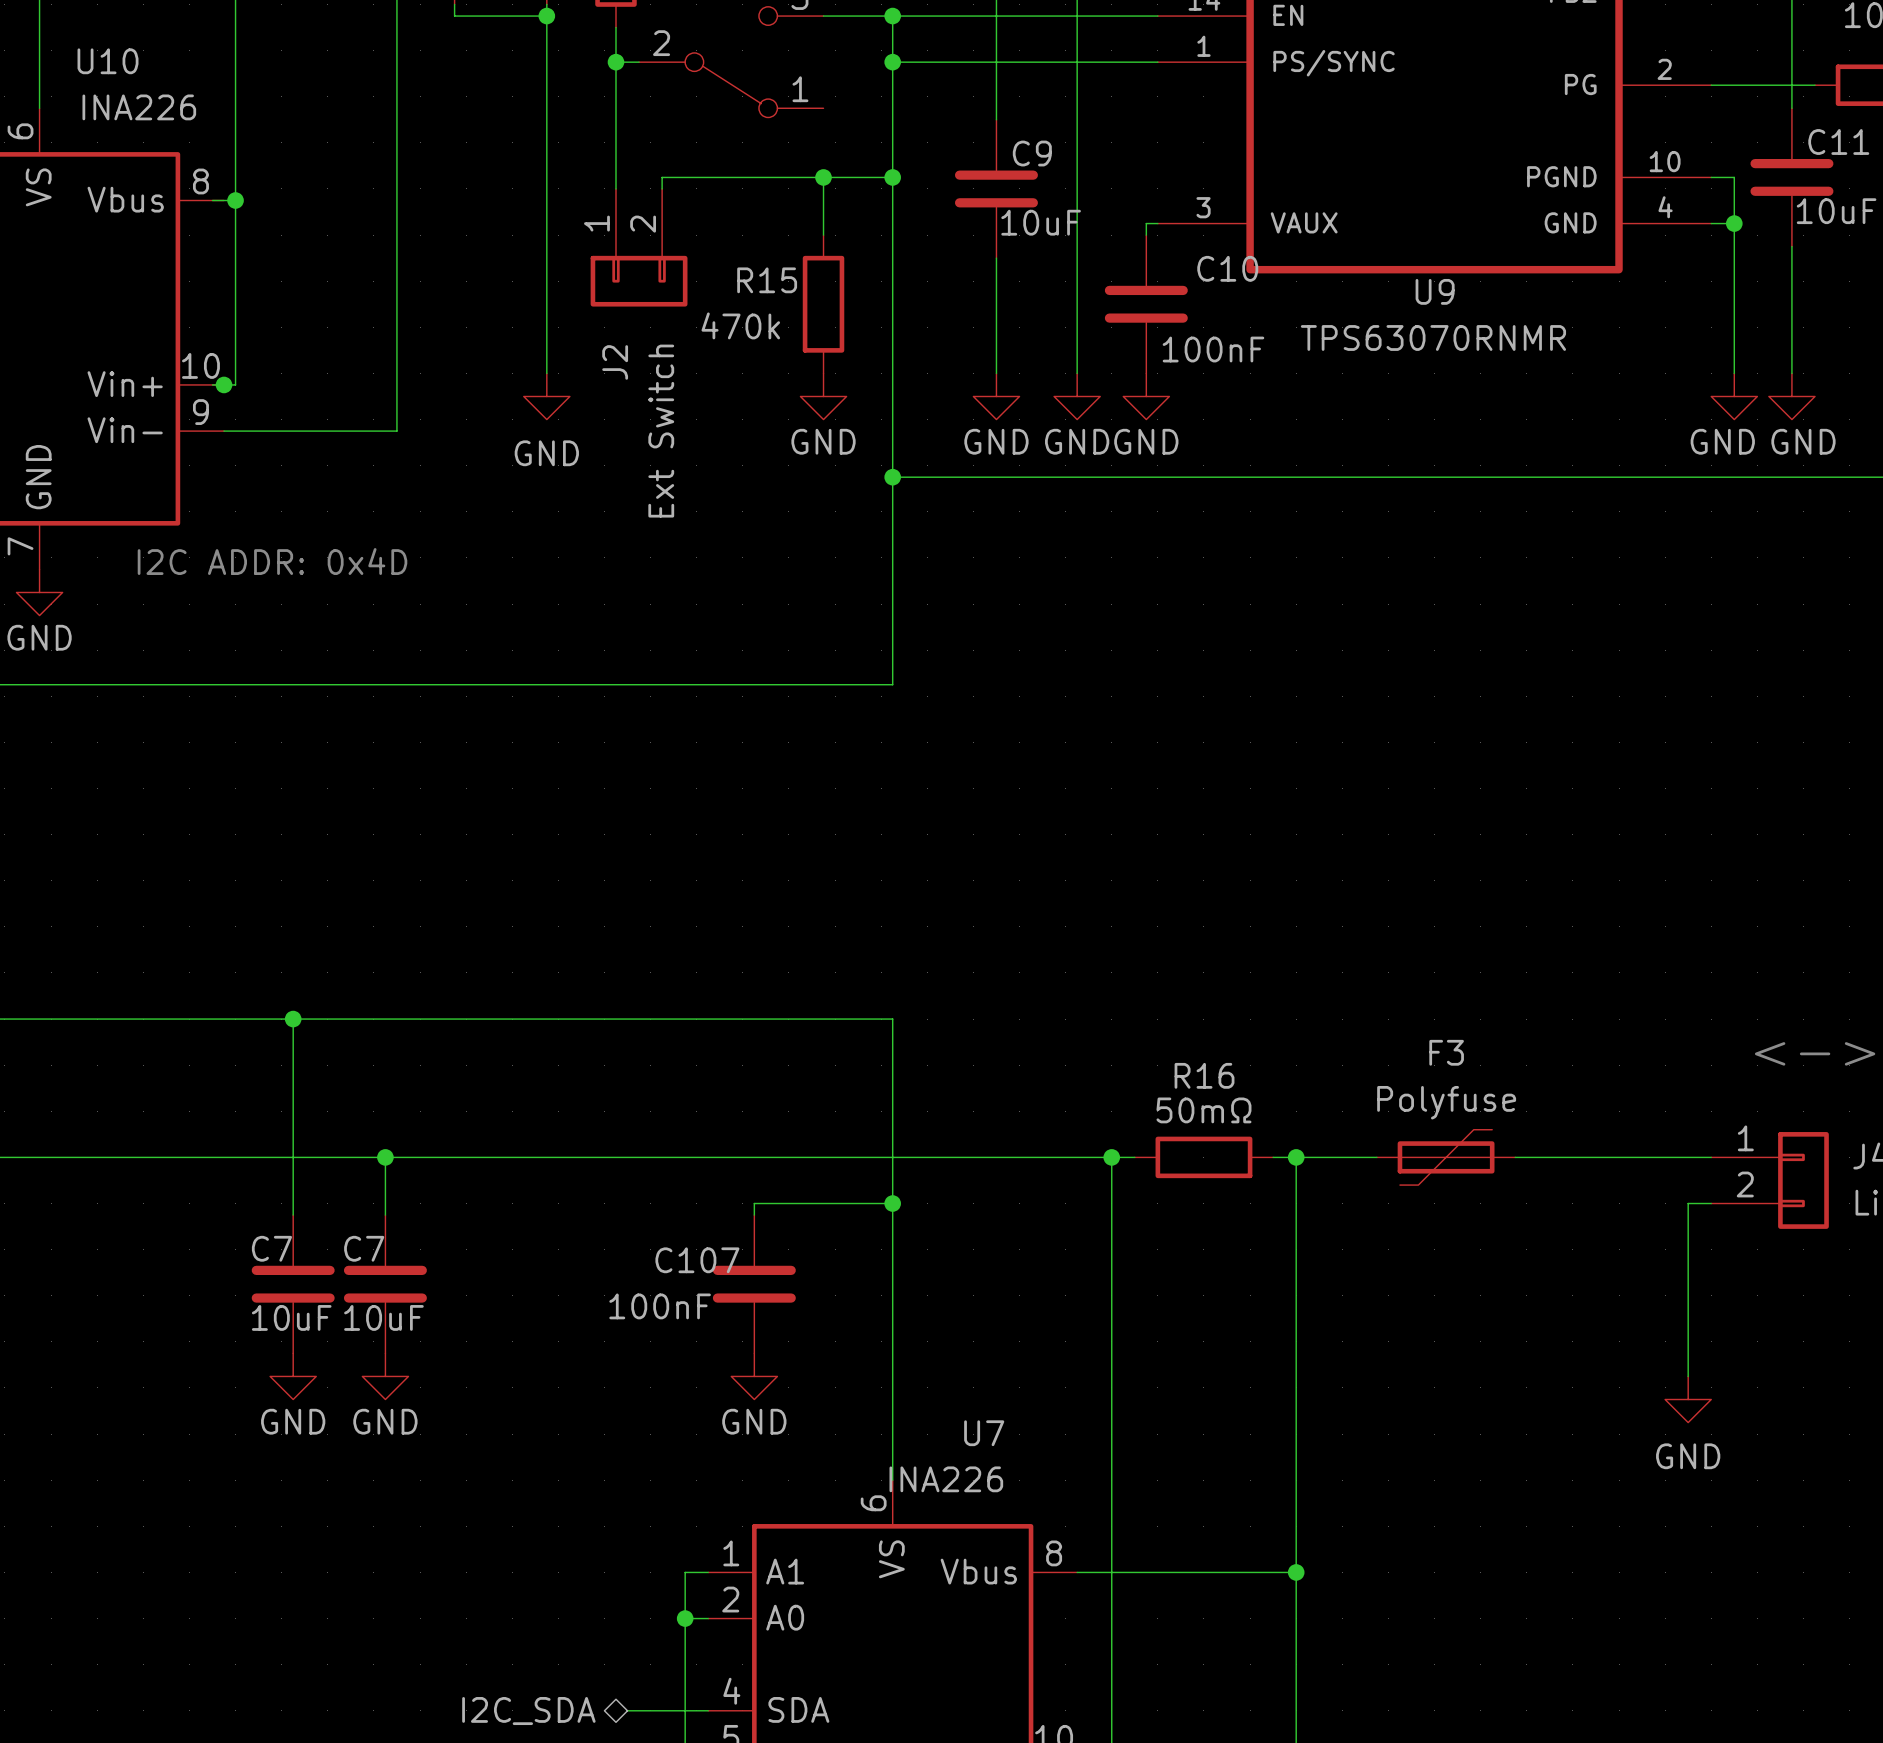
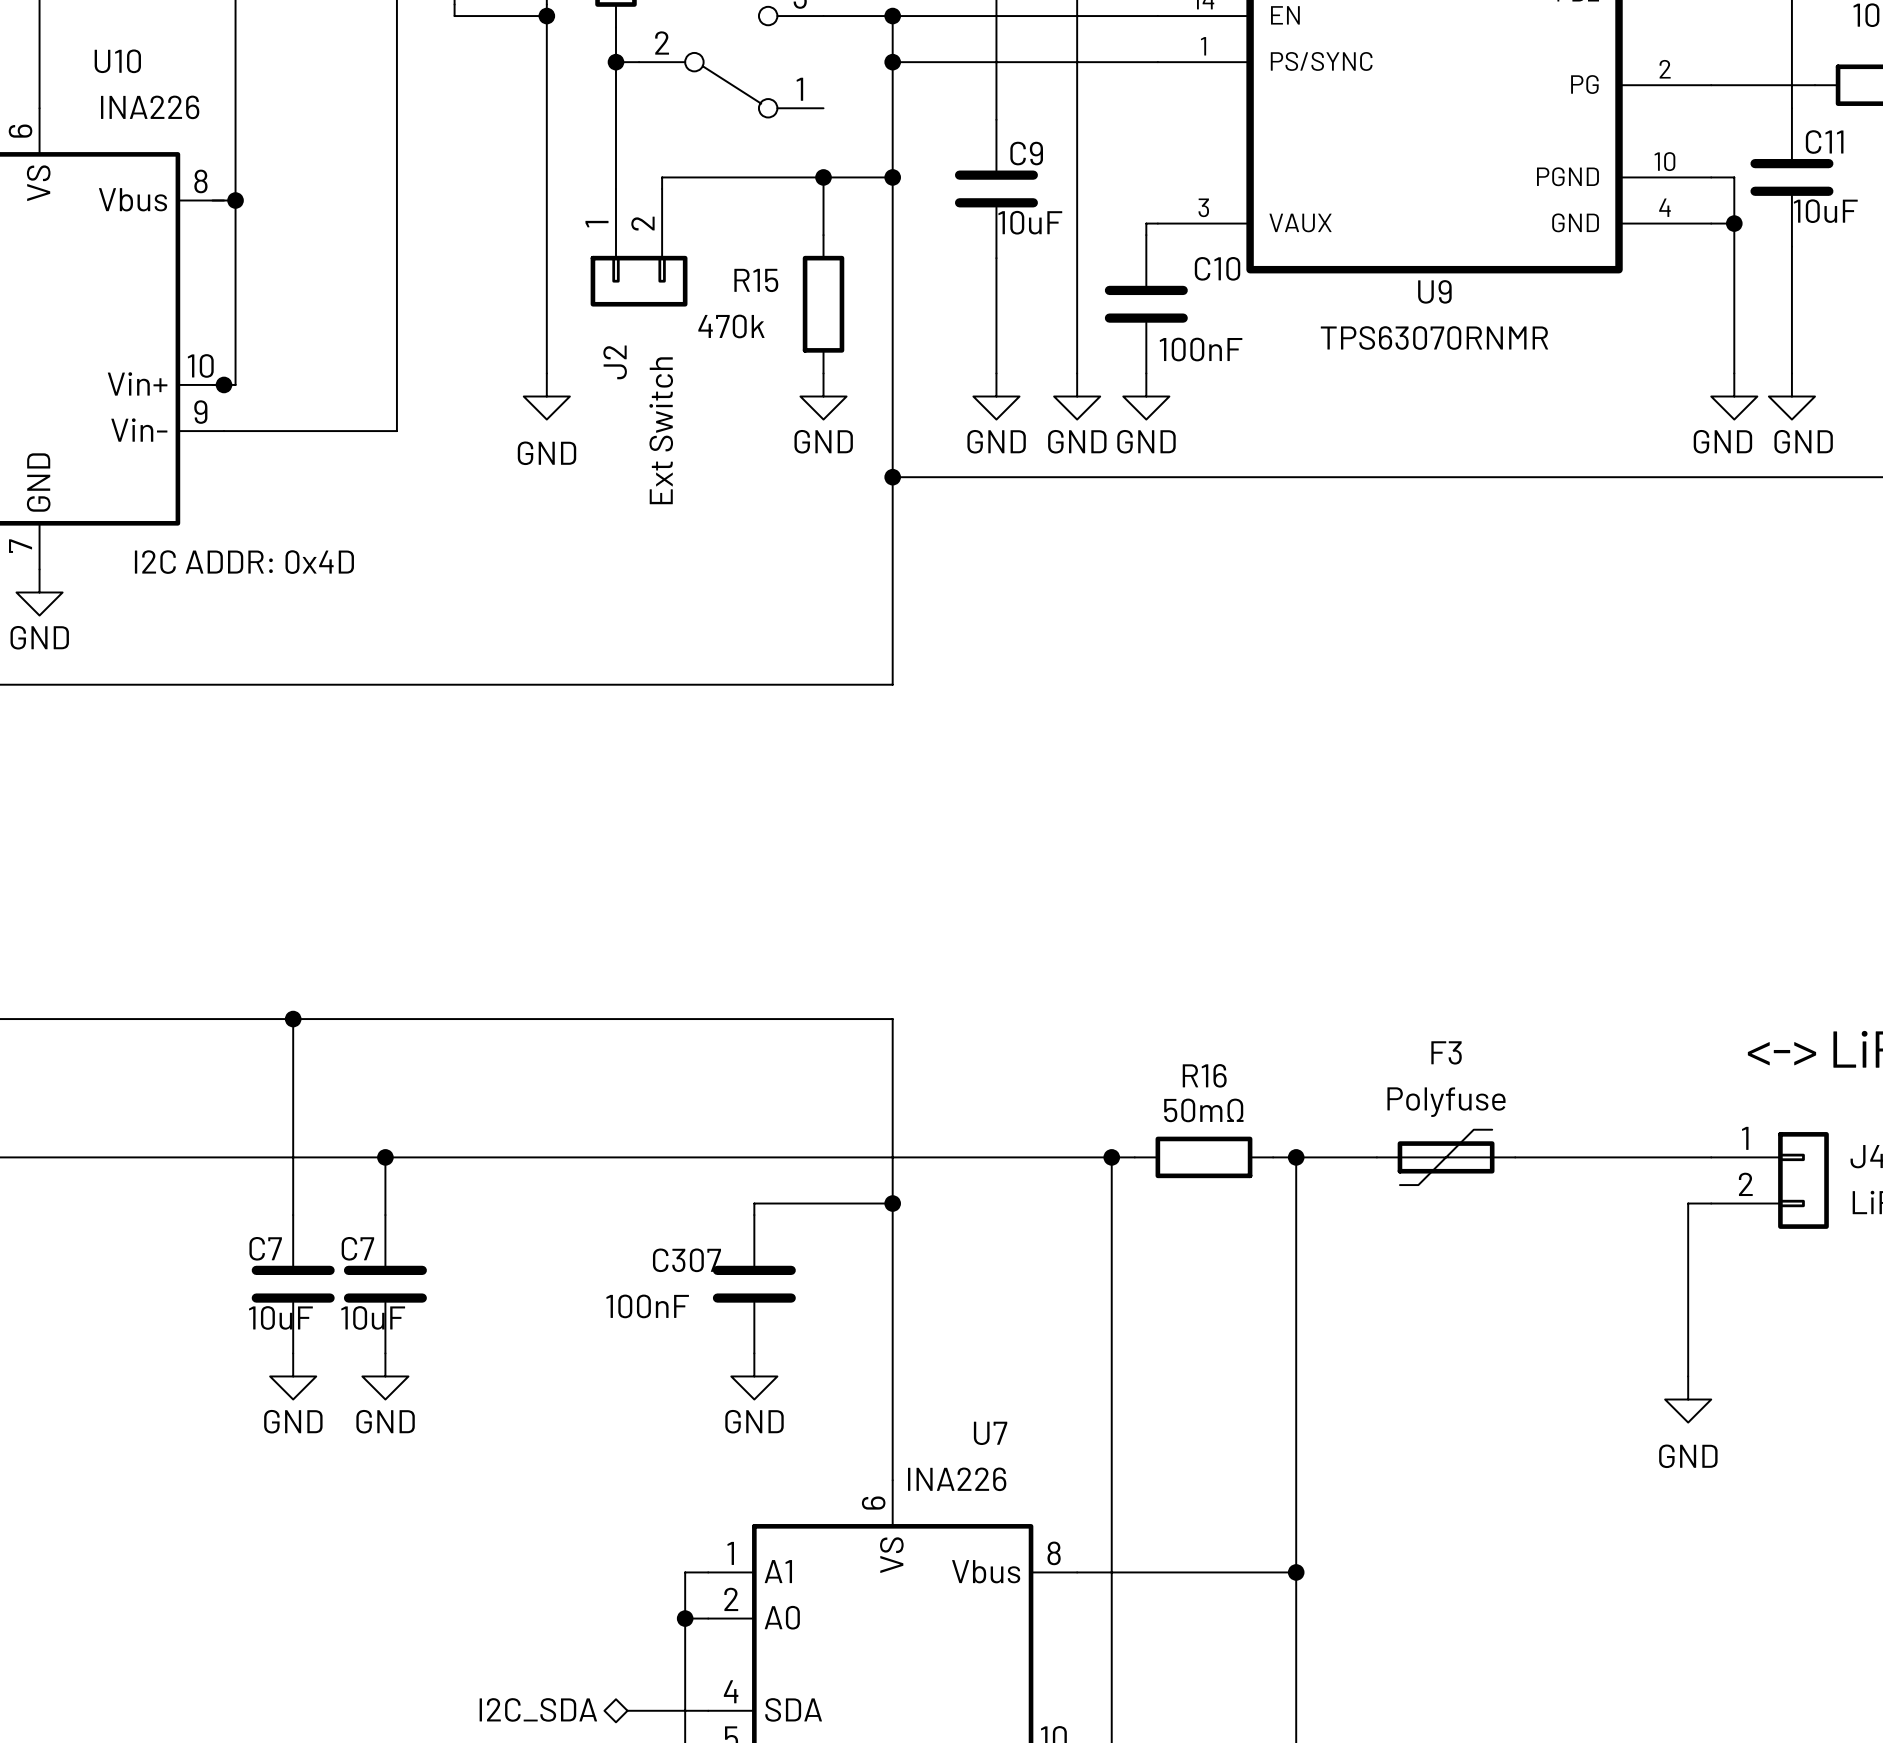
C107 name: C107 (697, 1260) -> C307 (686, 1260)

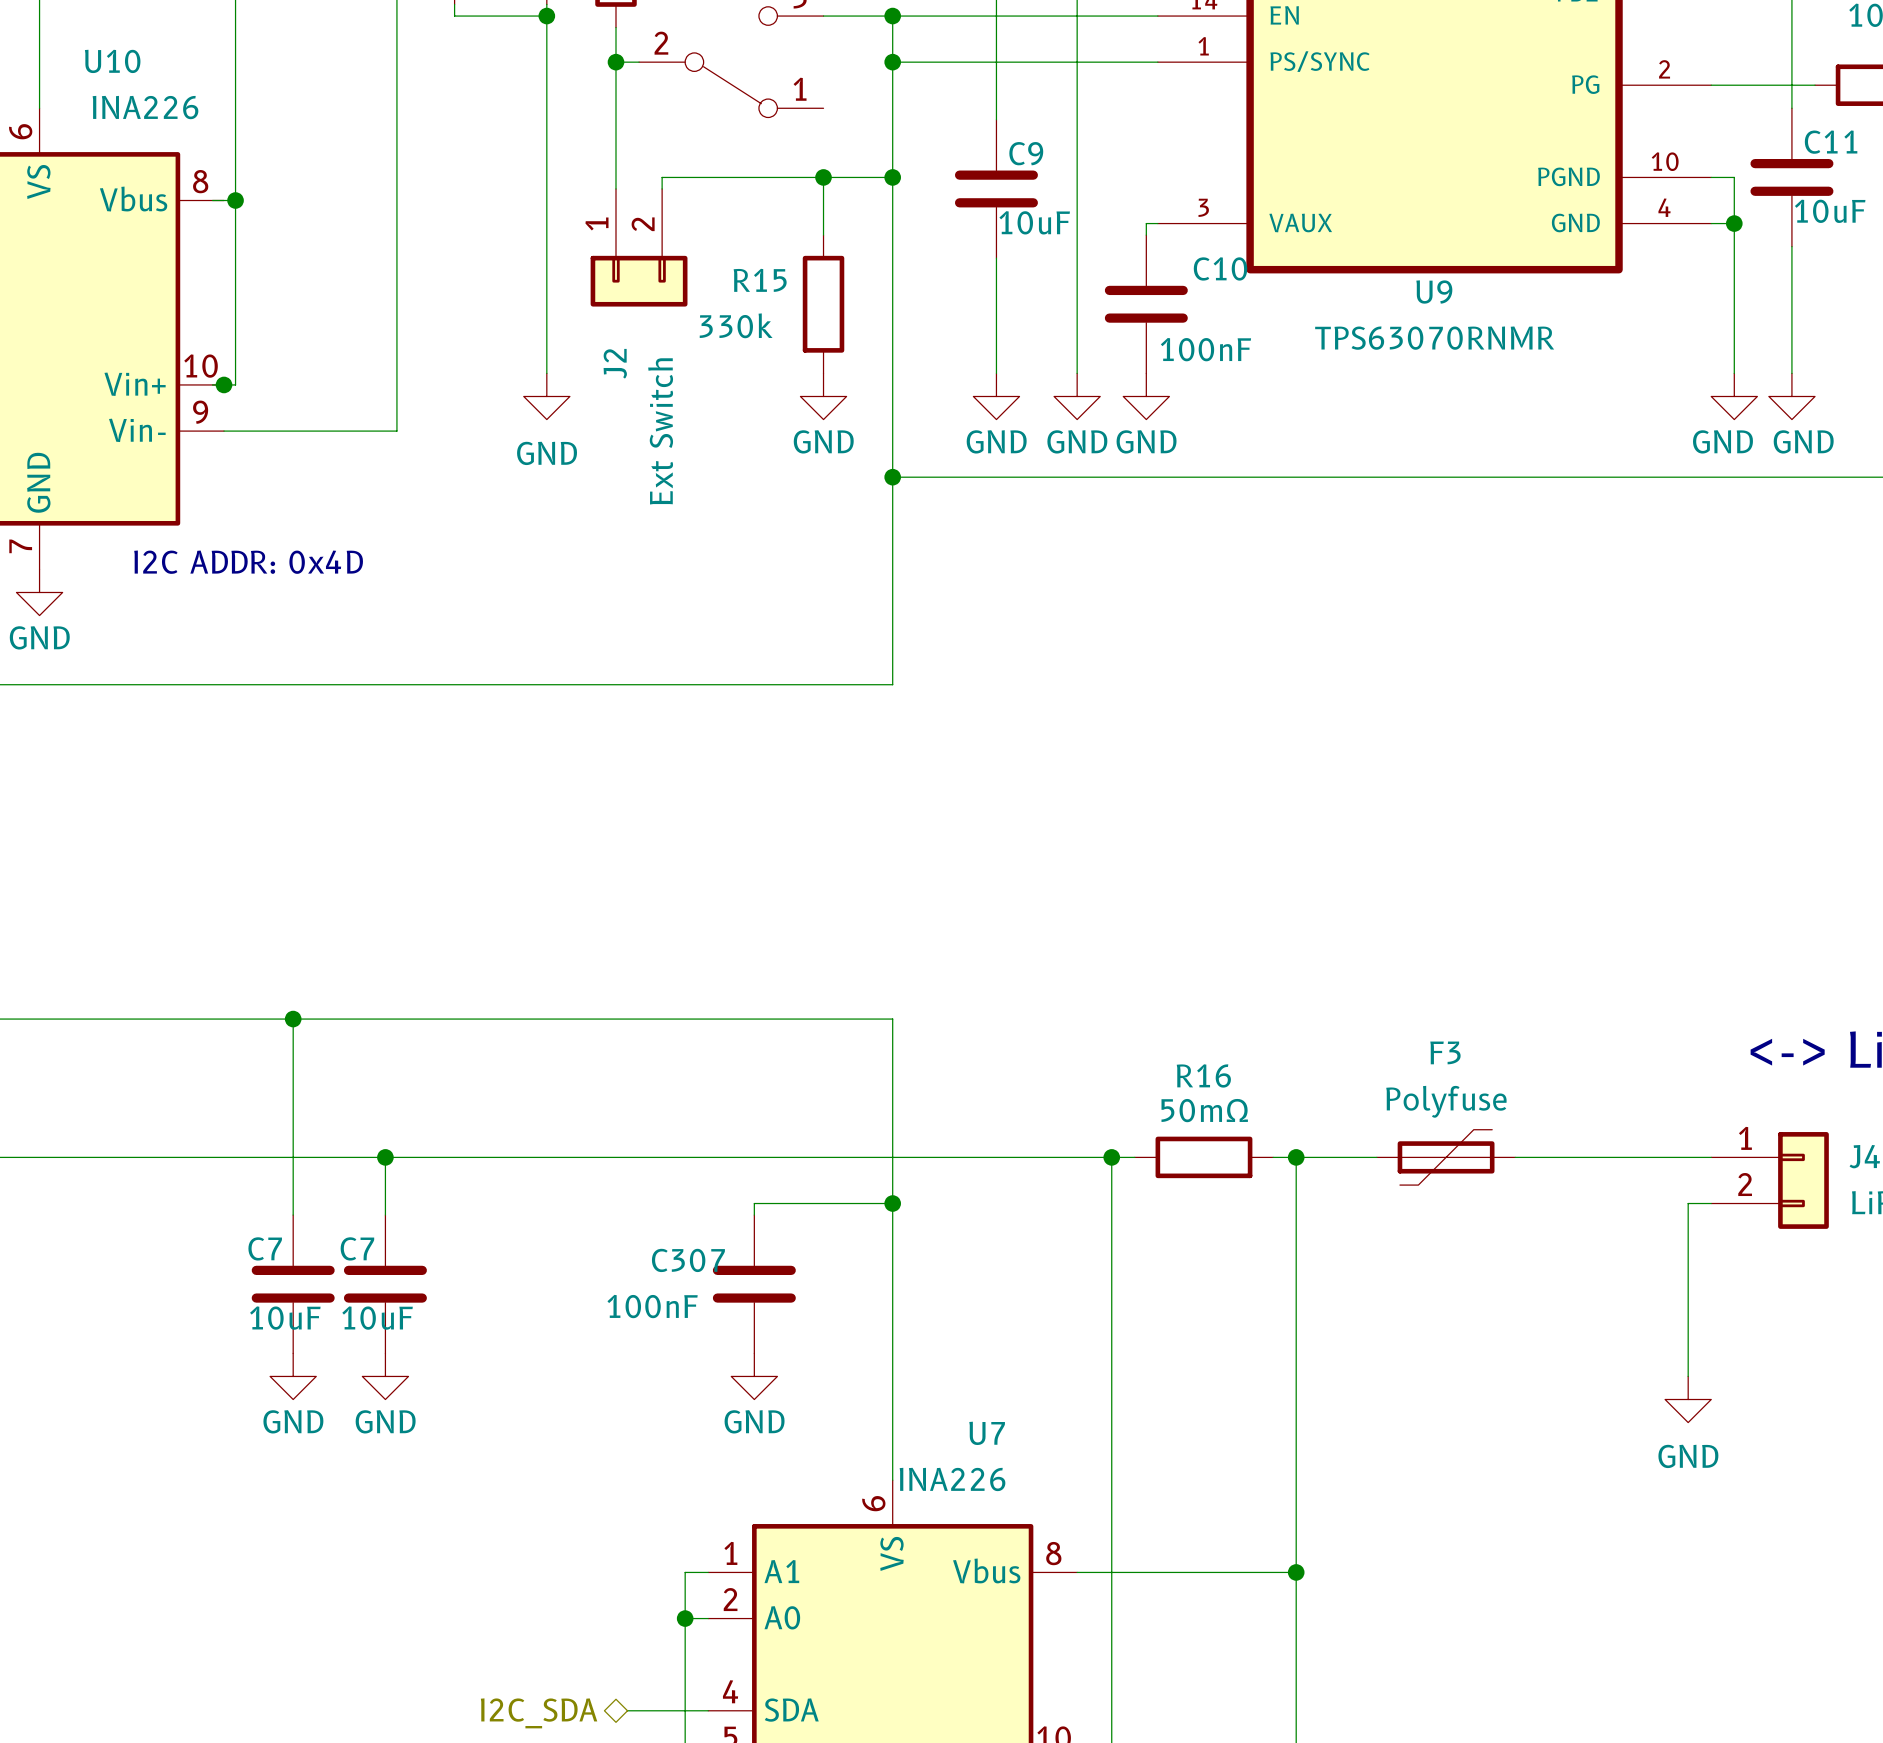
R15 value: 470k (731, 326) -> 330k (736, 325)

